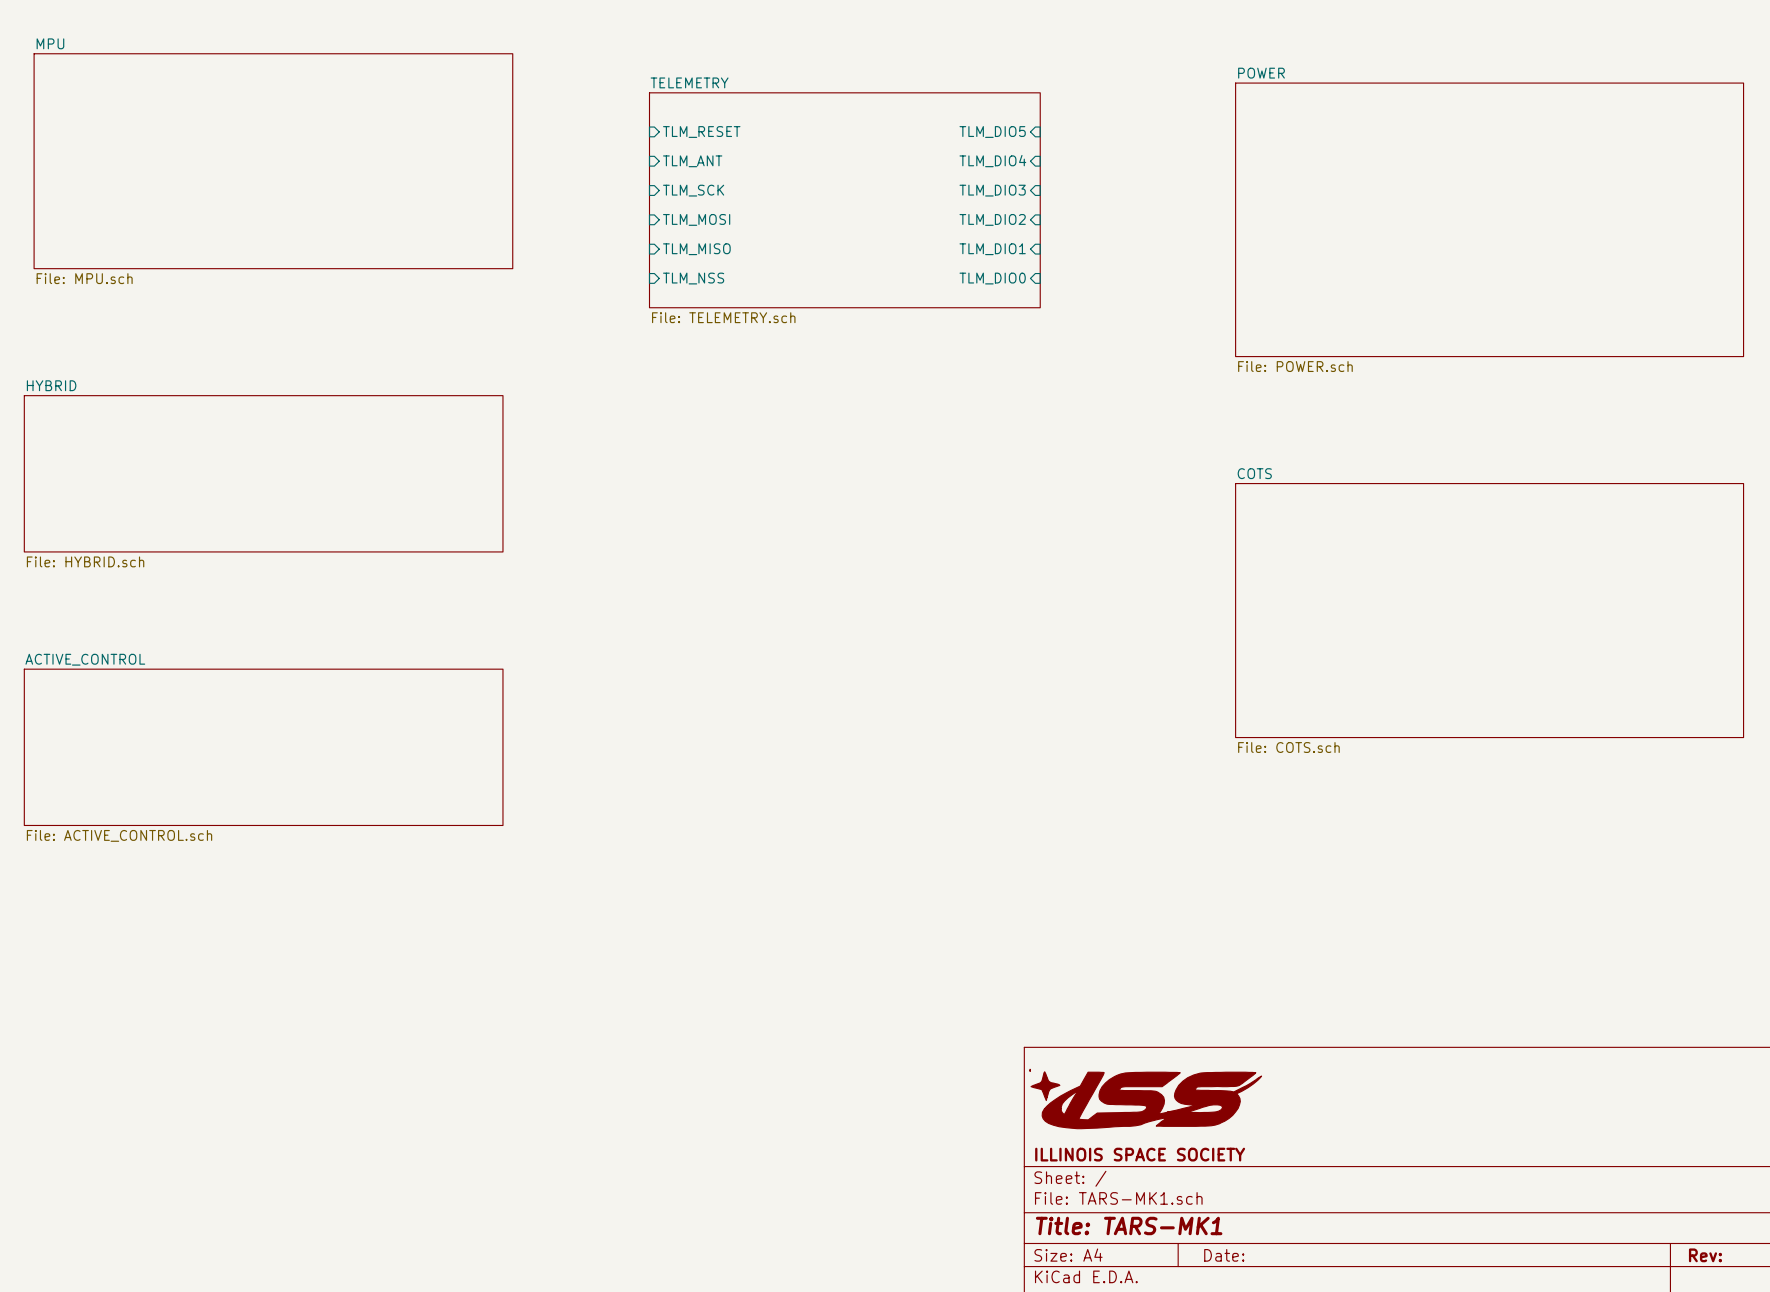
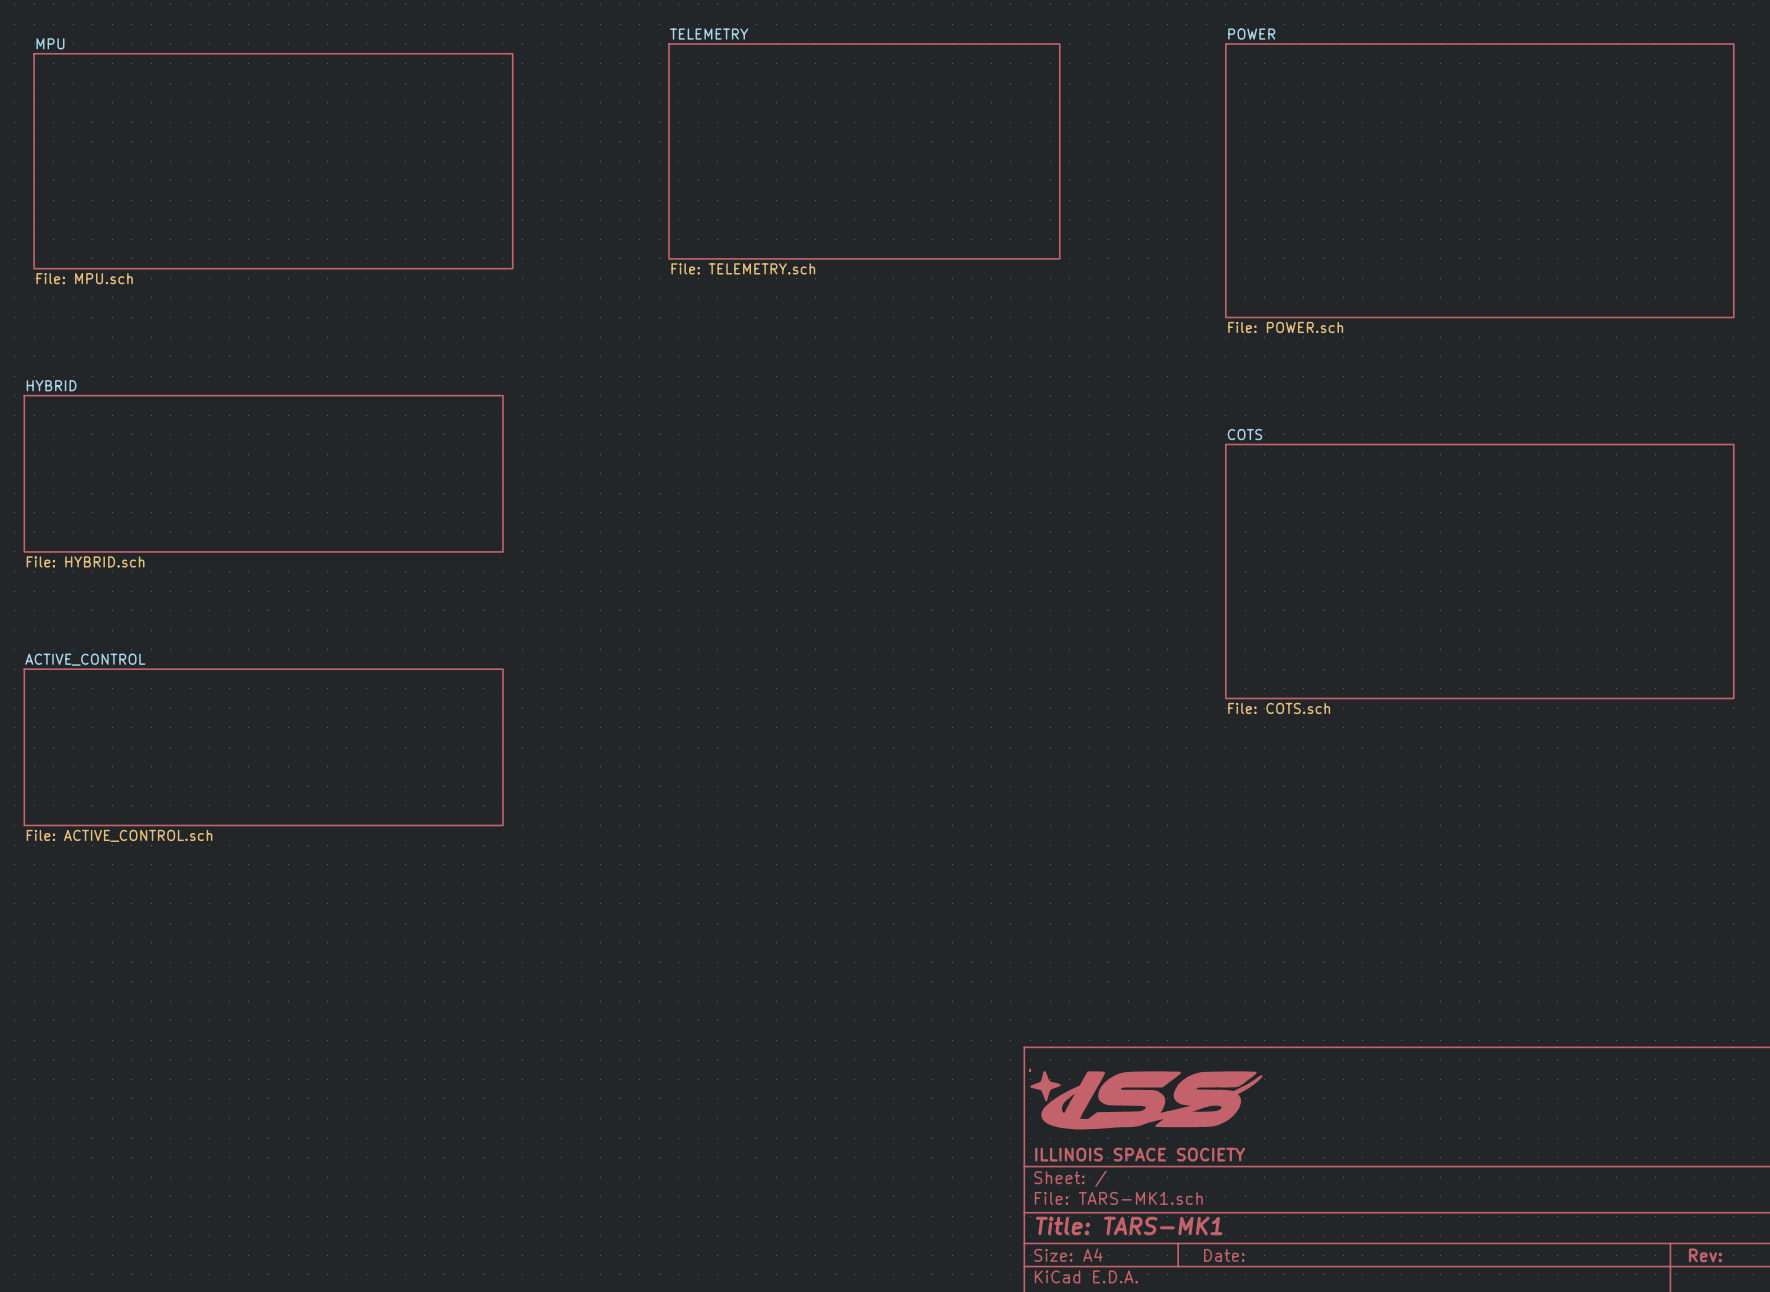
sheet pin: TLM_RESET (701, 132) -> none
sheet pin: TLM_DIO5 (992, 132) -> none
sheet pin: TLM_ANT (692, 161) -> none
sheet pin: TLM_DIO4 (992, 161) -> none
sheet pin: TLM_SCK (693, 190) -> none
sheet pin: TLM_DIO3 (992, 190) -> none
sheet TELEMETRY position: (844, 200) -> (864, 151)
sheet pin: TLM_MOSI (696, 219) -> none
sheet pin: TLM_DIO2 (992, 219) -> none
sheet POWER position: (1489, 219) -> (1479, 180)
sheet pin: TLM_MISO (696, 249) -> none
sheet pin: TLM_DIO1 (992, 249) -> none
sheet pin: TLM_NSS (693, 278) -> none
sheet pin: TLM_DIO0 (992, 278) -> none
sheet COTS position: (1489, 610) -> (1479, 571)

